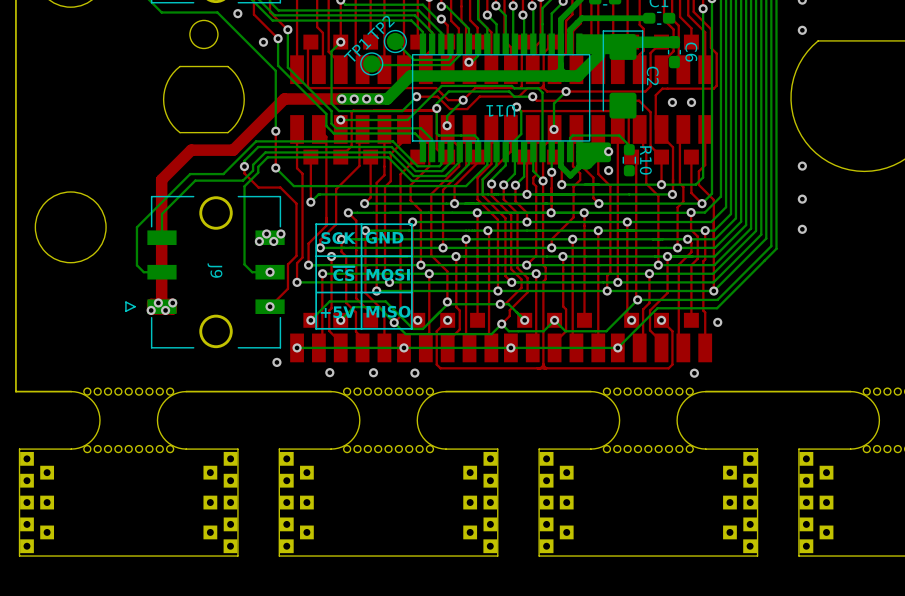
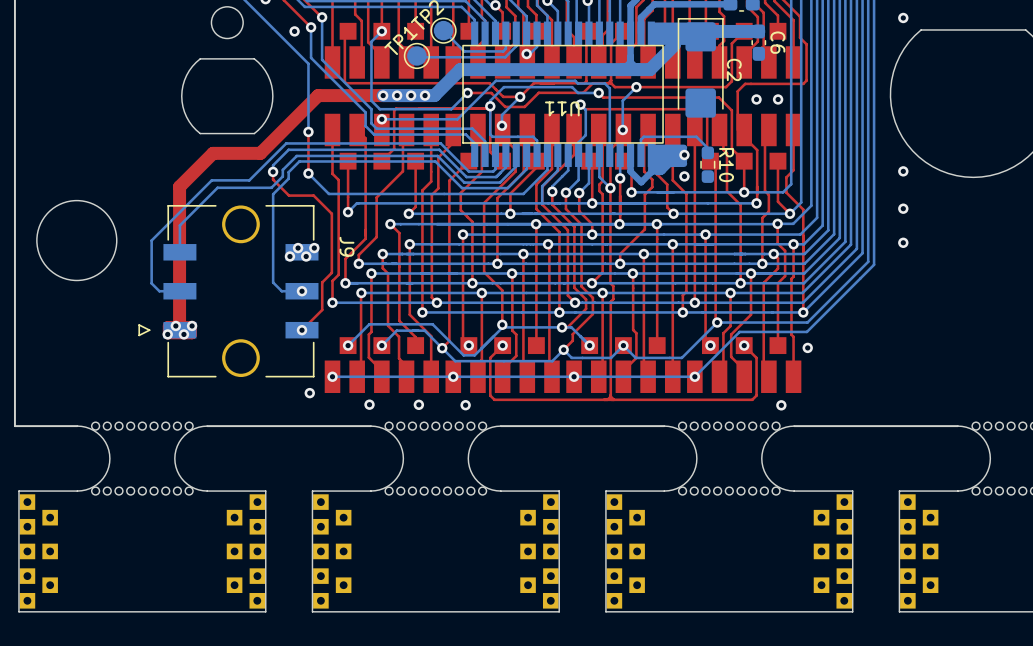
line: (361, 224) (361, 328) -> none
line: (411, 224) (316, 224) (316, 328) (411, 328) (411, 224) -> none
text: GND (384, 237) -> none
text: SCK (338, 238) -> none
line: (411, 256) (316, 256) -> none
J9 name position: J9 (214, 270) -> J9 (346, 246)
text: ~{CS} (343, 273) -> none
text: MOSI (388, 274) -> none
line: (411, 292) (316, 292) -> none
text: MISO (388, 311) -> none
text: +5V (338, 312) -> none

